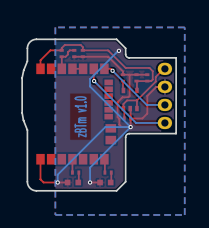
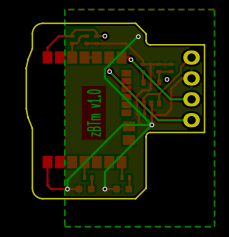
top track: (82, 50) (108, 50) (125, 67) (149, 67) (152, 71) (152, 79) (147, 81) -> (96, 36) (104, 36)
via: none -> (104, 36)
via: none -> (167, 79)

